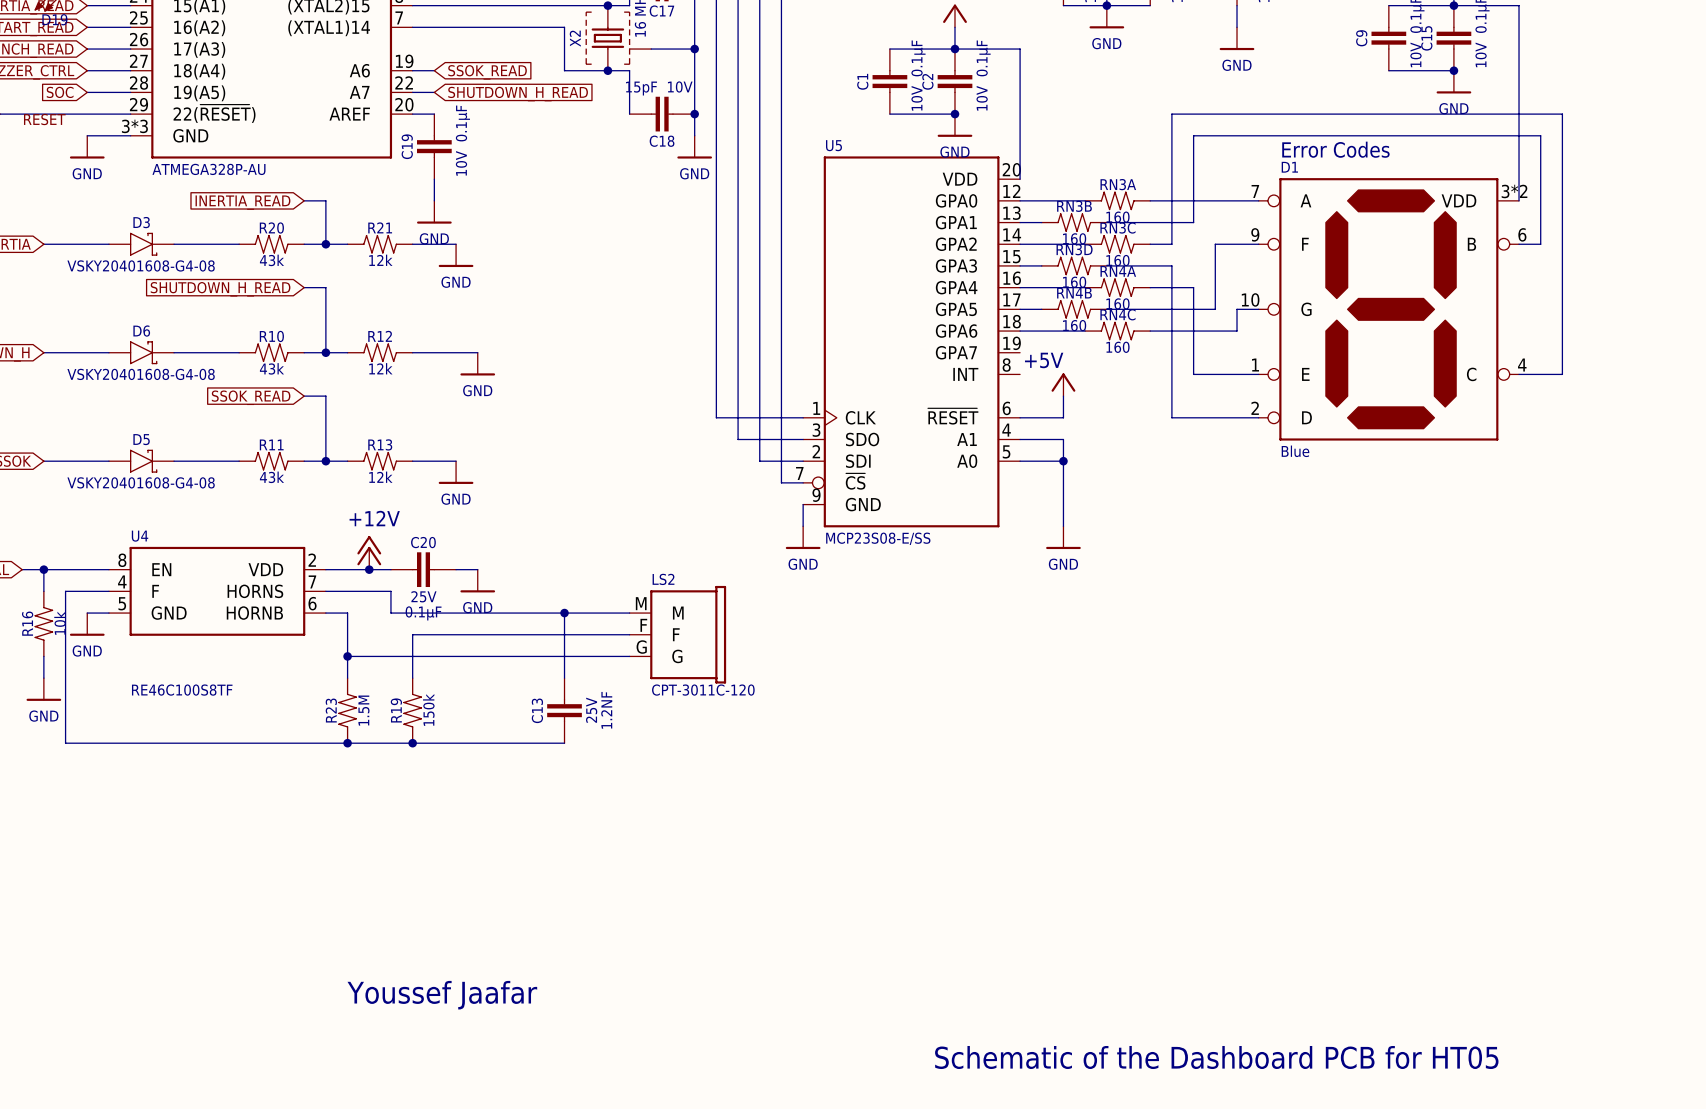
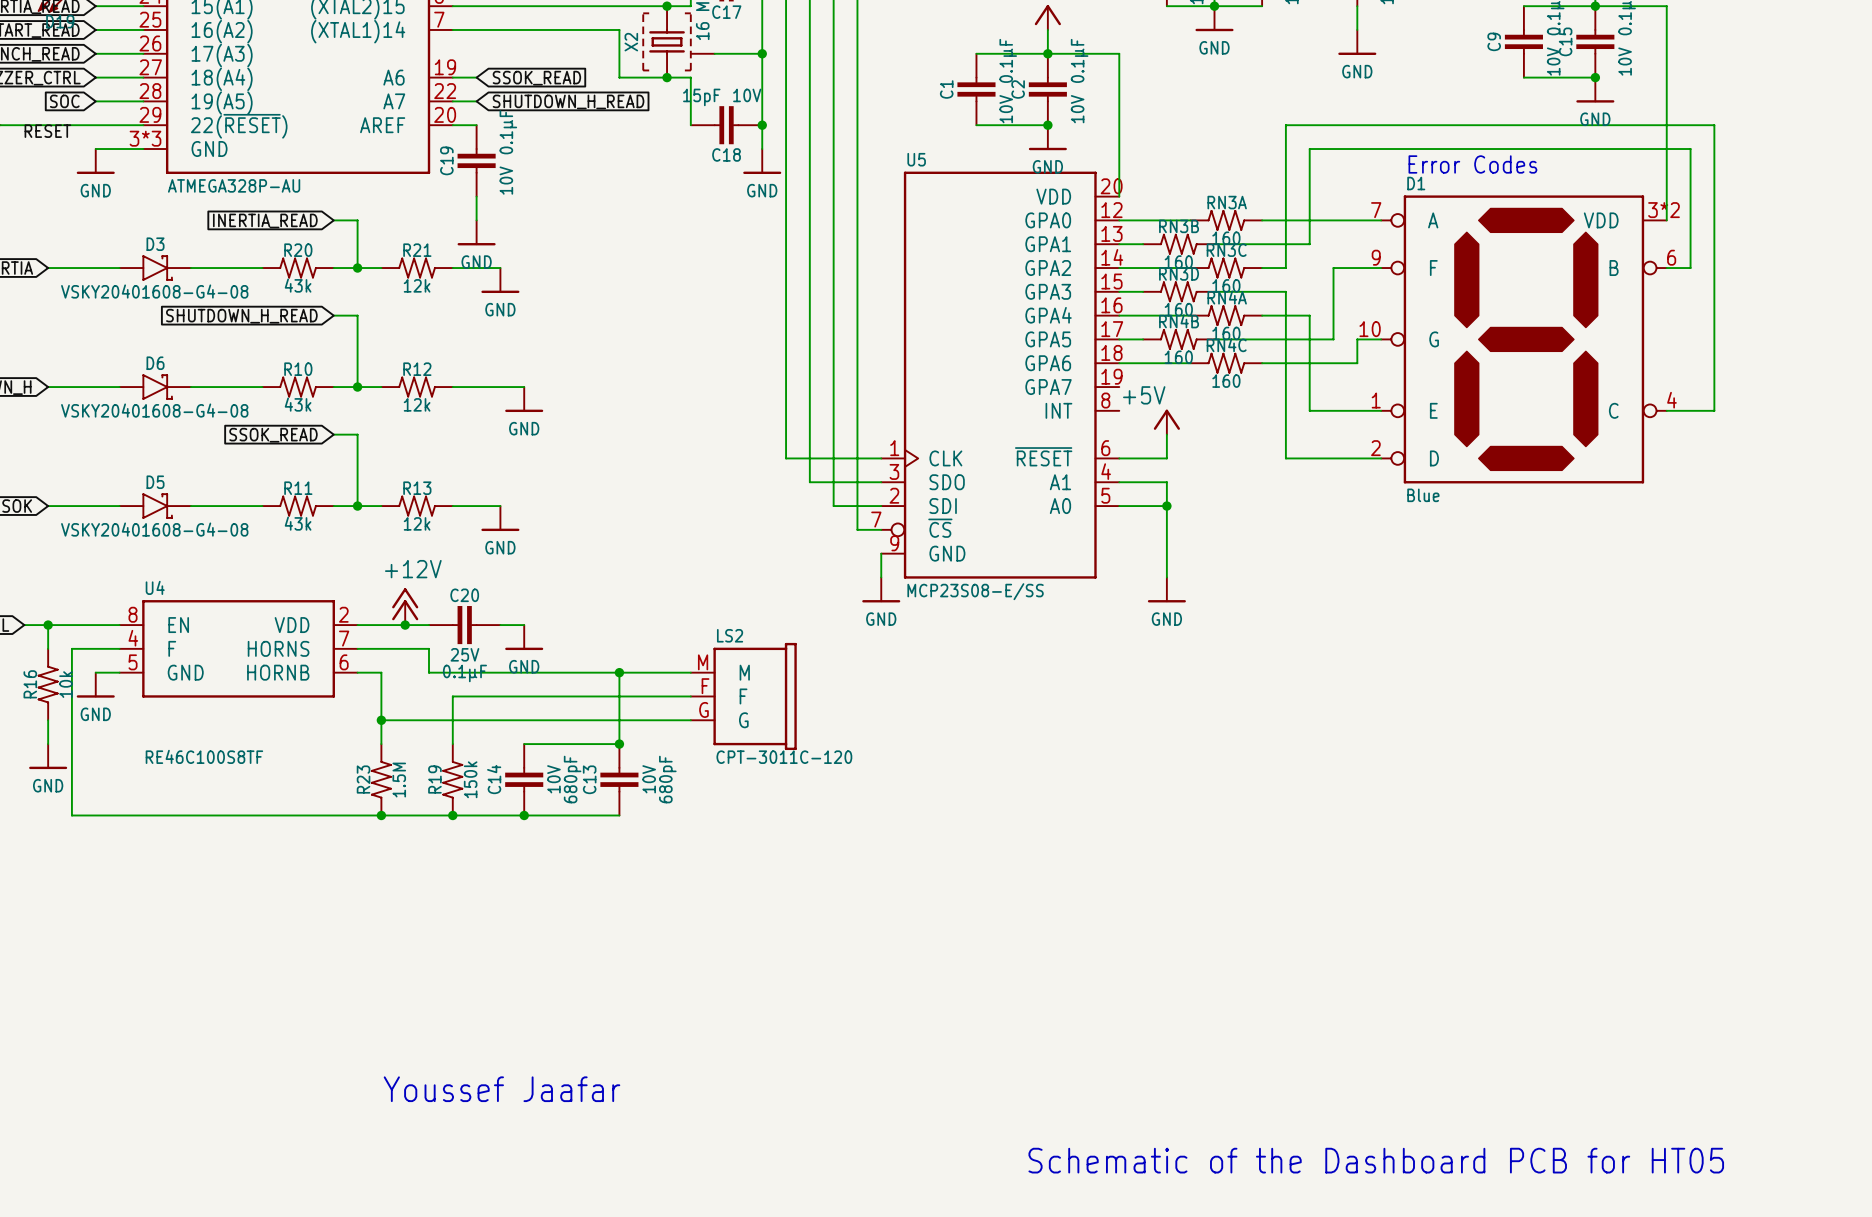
wire: none -> (524, 744) (619, 744)
junction: none -> (619, 744)
C14: none -> (524, 779)
C13 text: 25V (591, 710) -> 10V (649, 779)
C13 text: 1.2NF (606, 710) -> 680pF (667, 779)
junction: none -> (524, 815)

